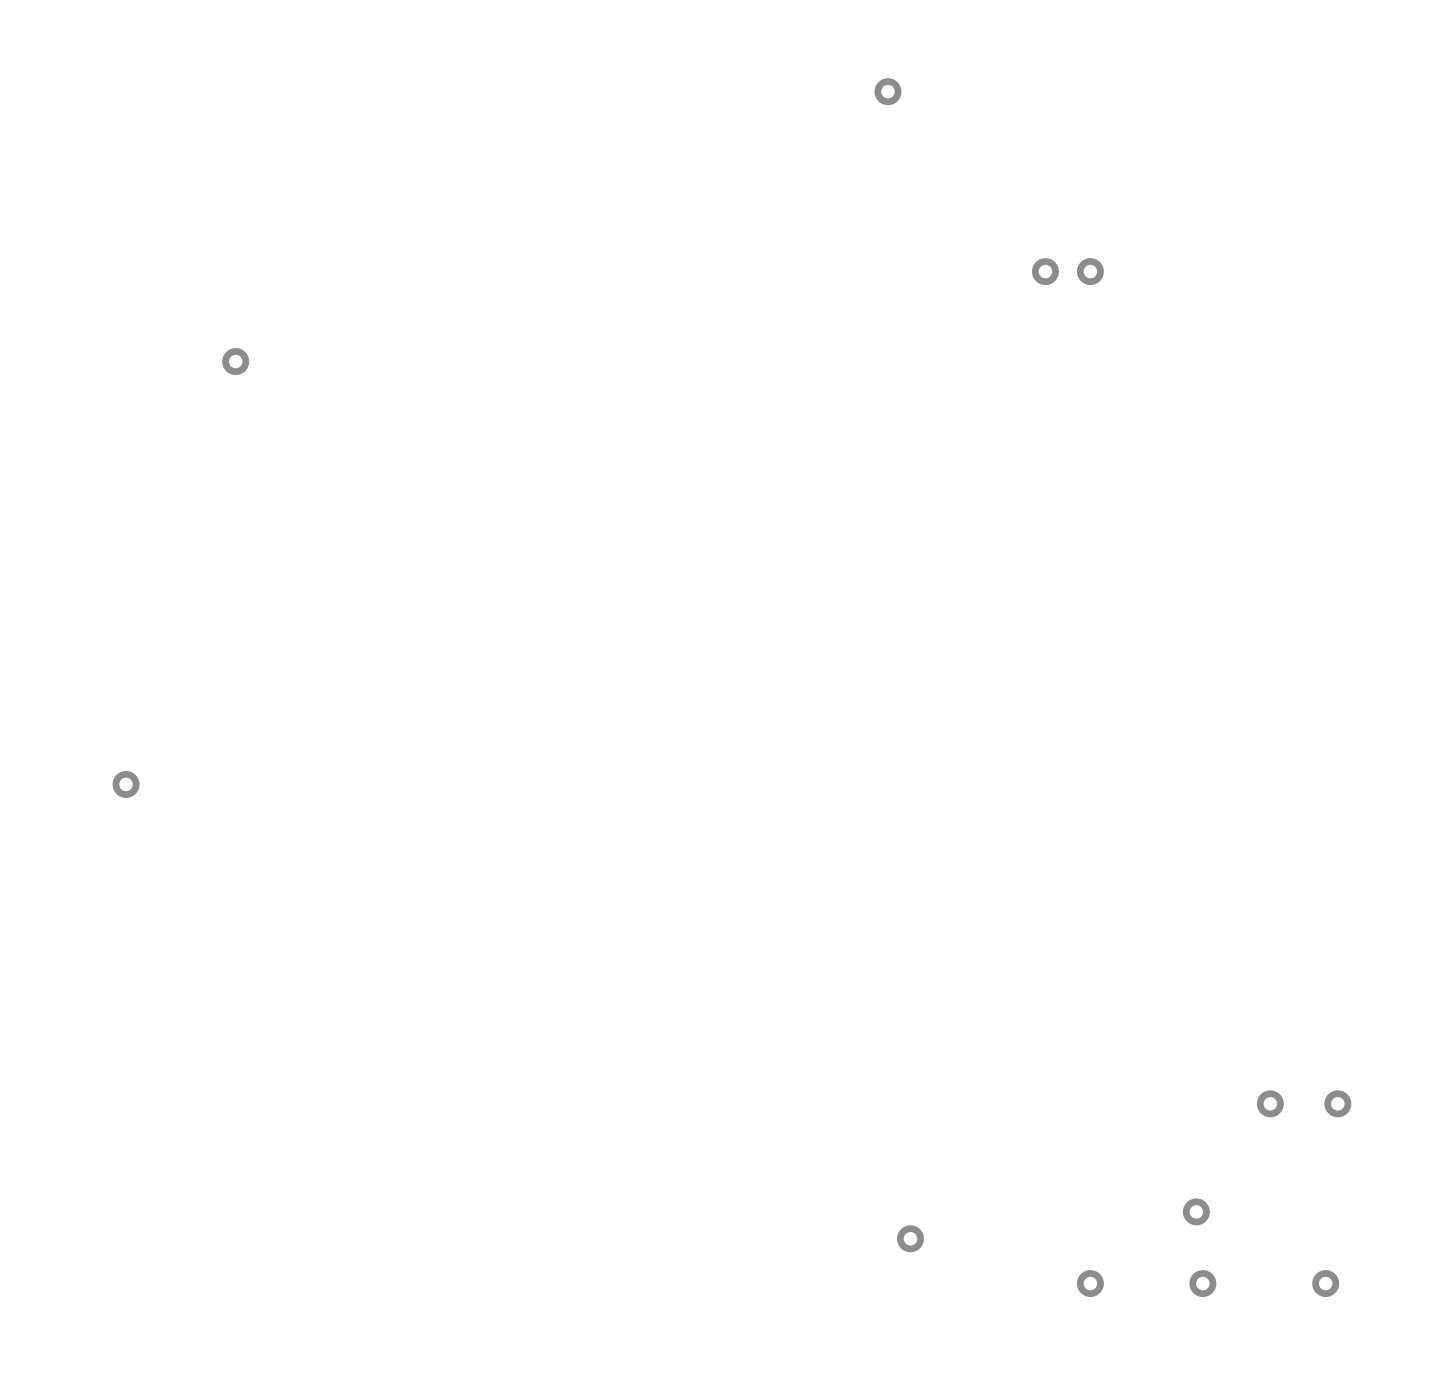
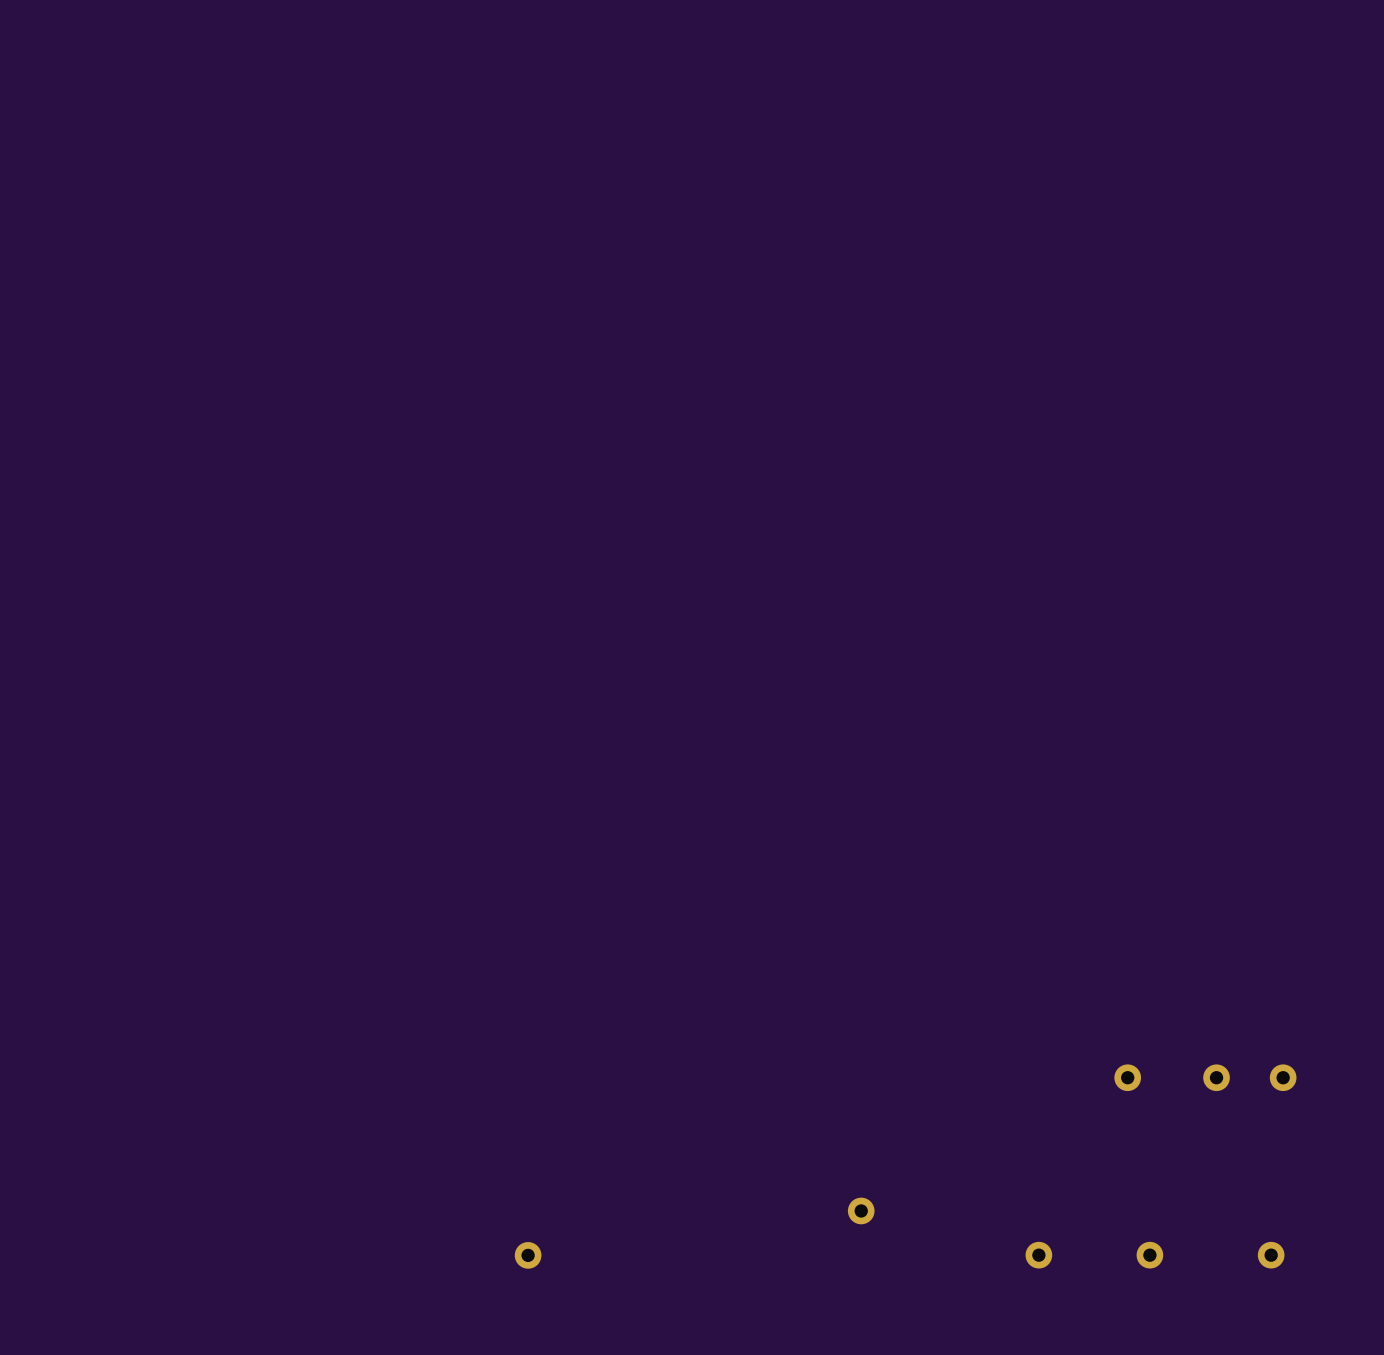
via: (887, 91) -> none
via: (1045, 271) -> none
via: (1090, 271) -> none
via: (235, 361) -> none
via: (126, 784) -> none
via position: (1196, 1211) -> (1127, 1077)
via: none -> (528, 1255)

